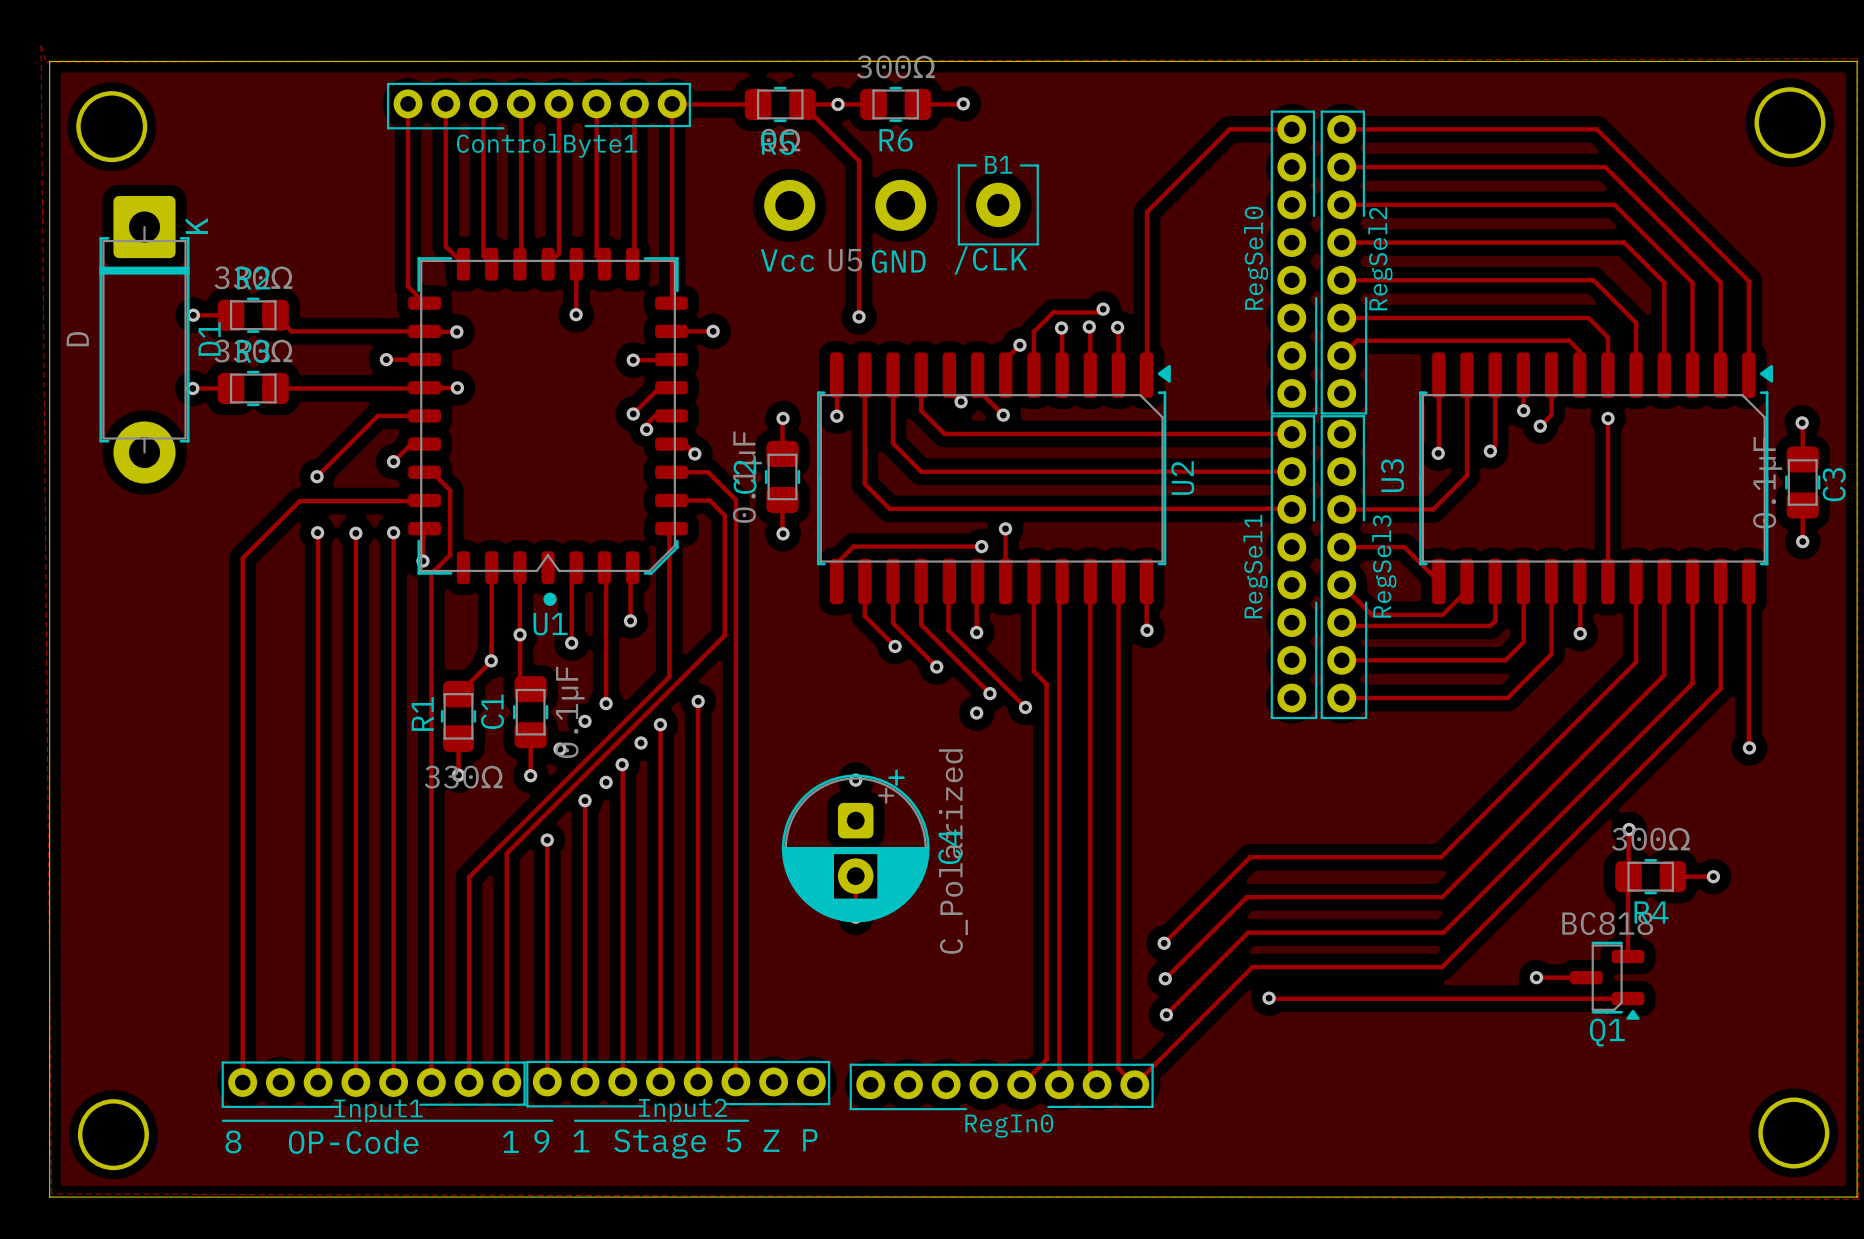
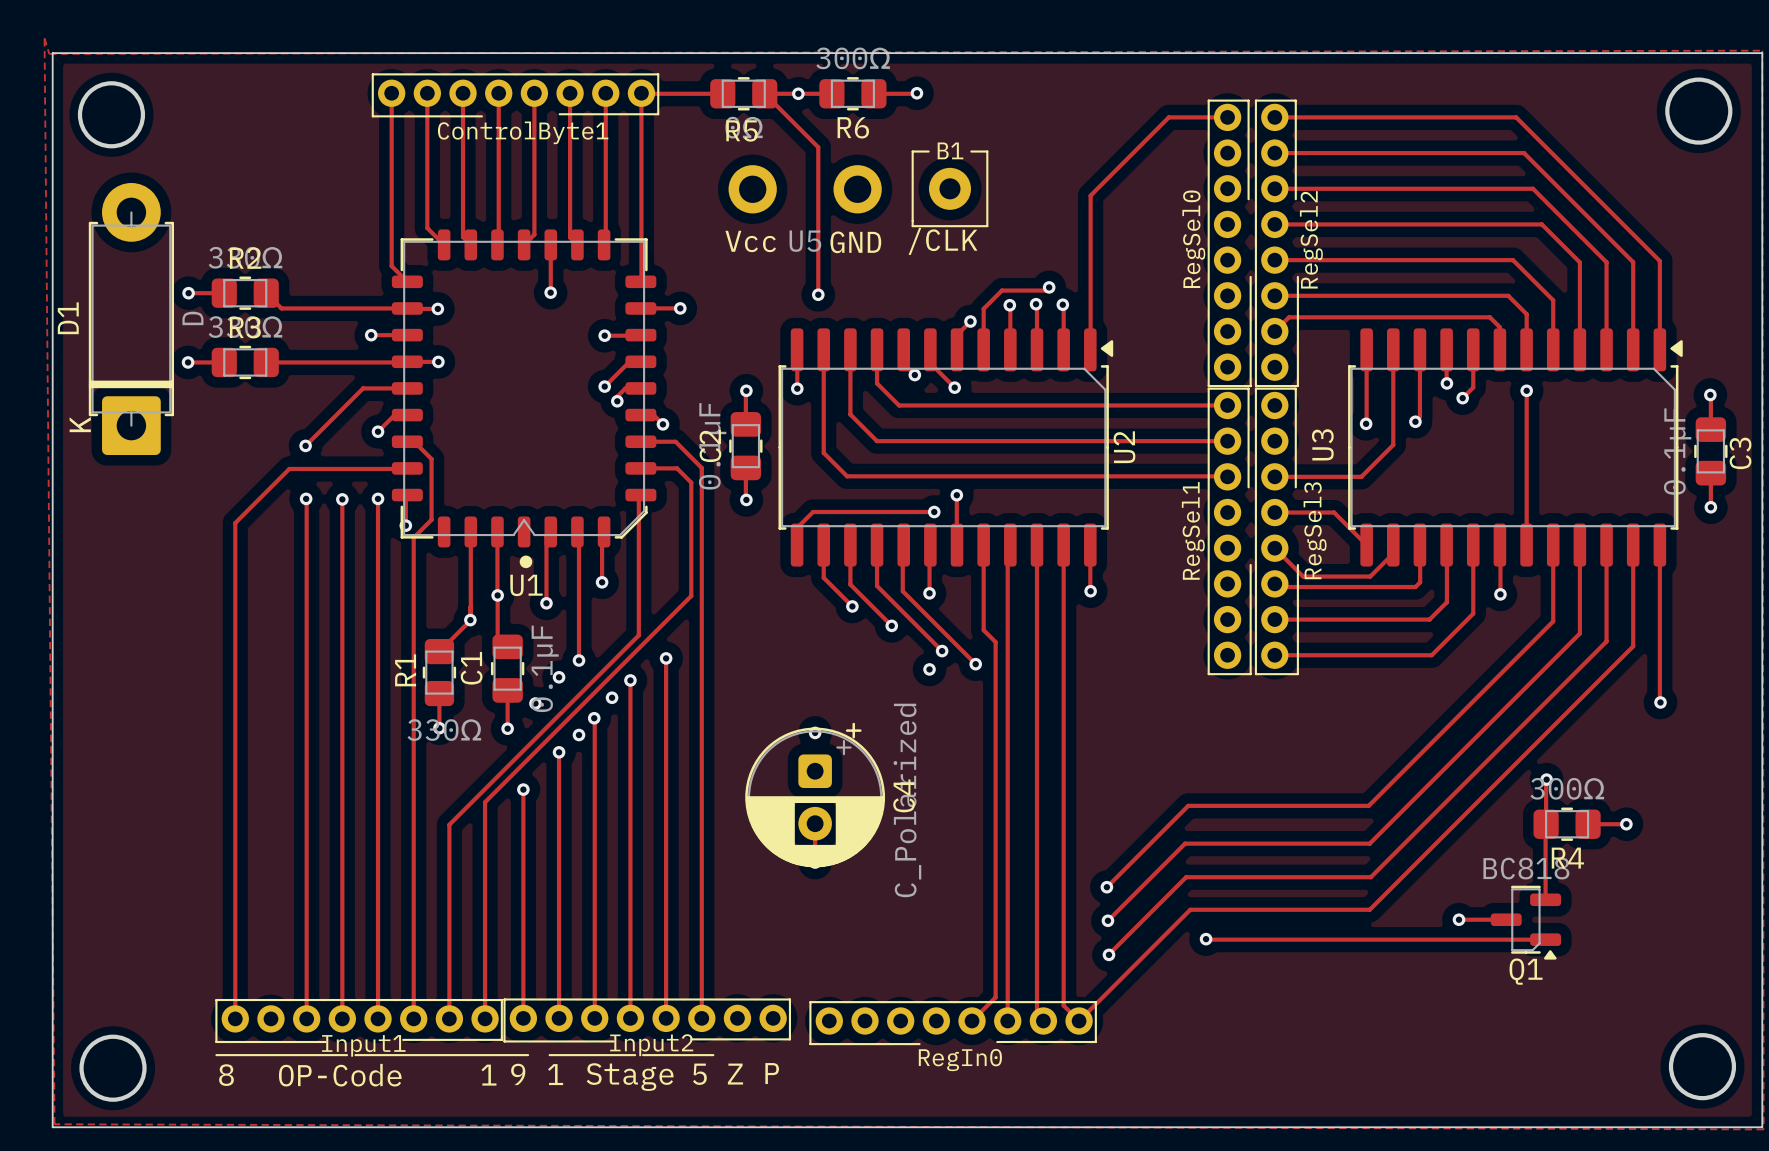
D1 rotation: 0° (144, 339) -> 180° (131, 319)

